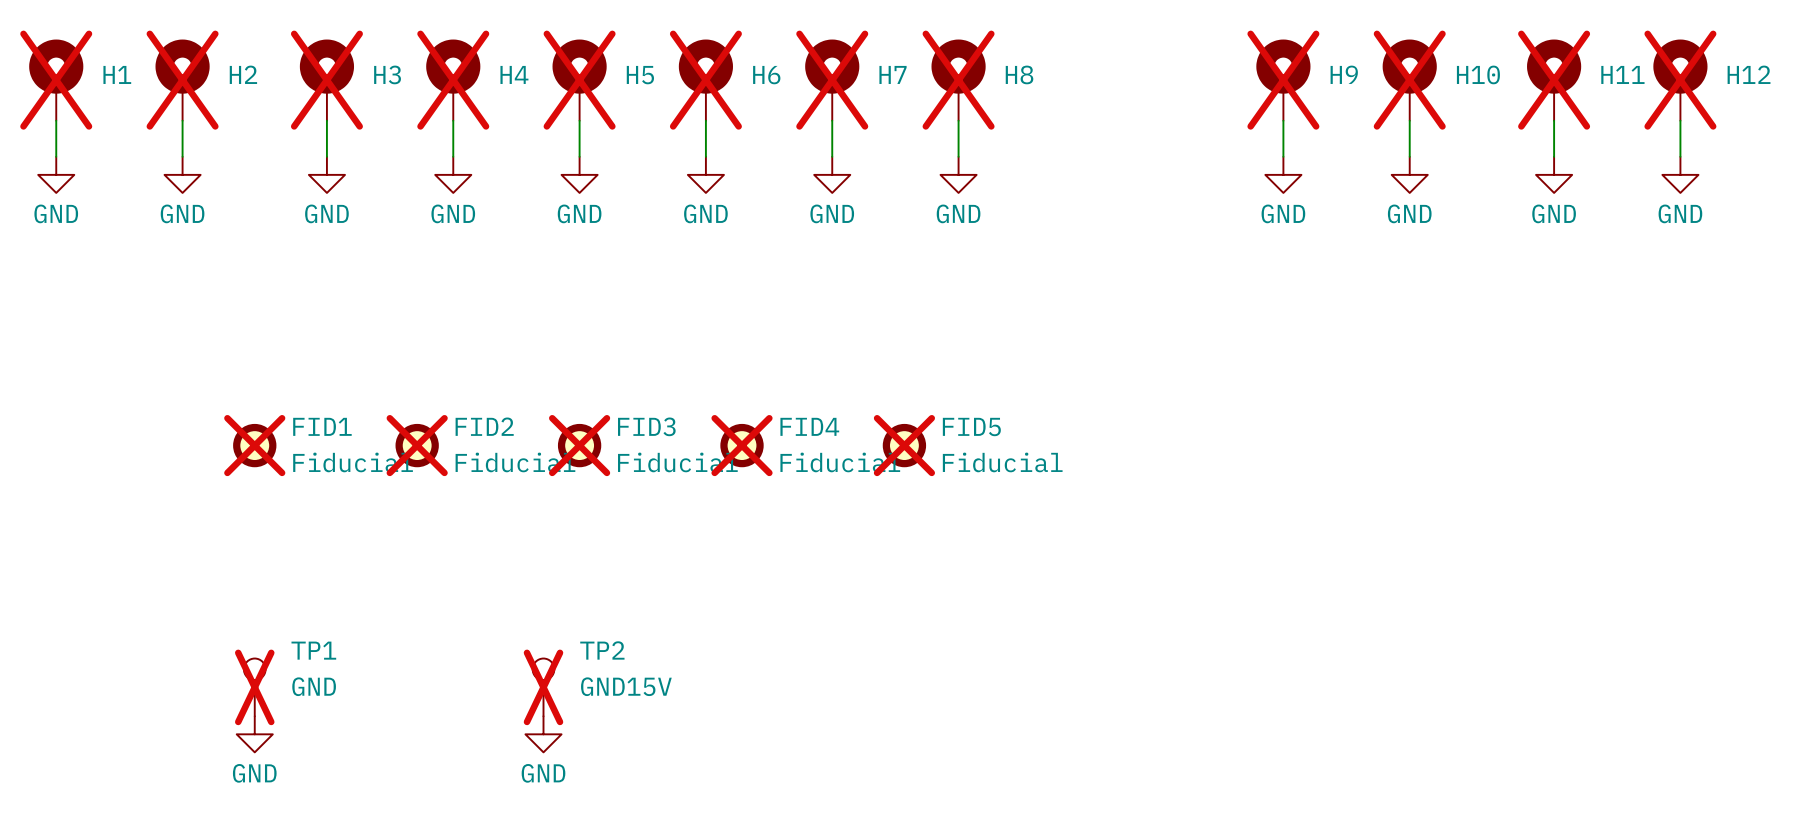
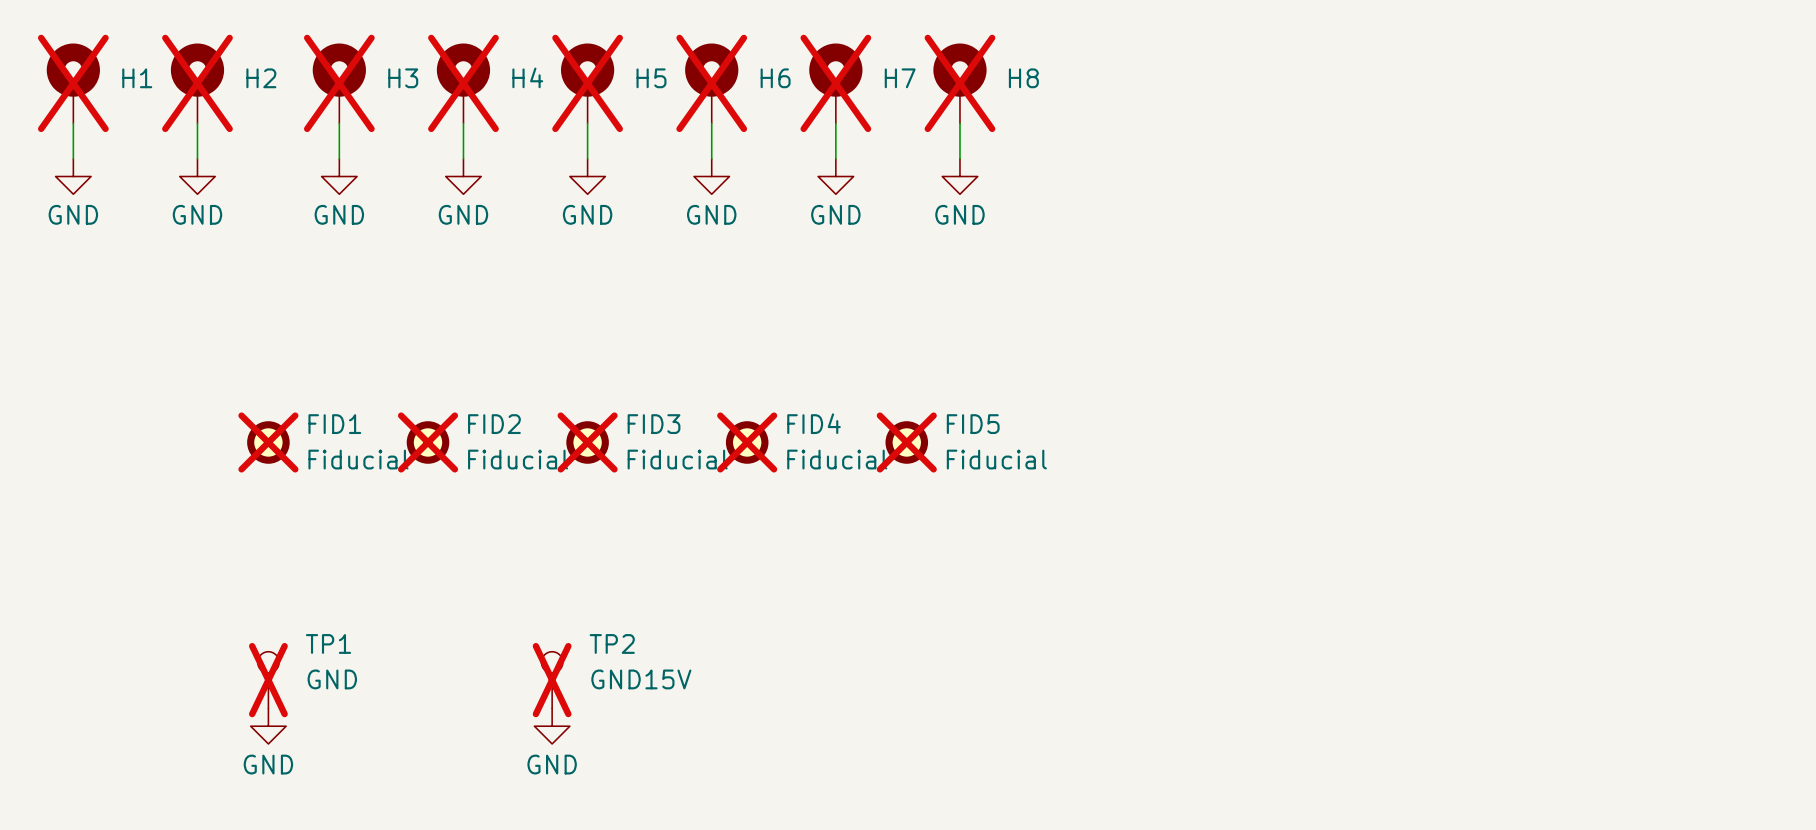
H9: (1283, 80) -> none
H10: (1409, 80) -> none
H11: (1554, 80) -> none
H12: (1680, 80) -> none
wire: (1283, 120) (1283, 156) -> none
wire: (1409, 120) (1409, 156) -> none
wire: (1554, 120) (1554, 156) -> none
wire: (1680, 120) (1680, 156) -> none
power symbol: GND (1283, 174) -> none
power symbol: GND (1409, 174) -> none
power symbol: GND (1554, 174) -> none
power symbol: GND (1680, 174) -> none

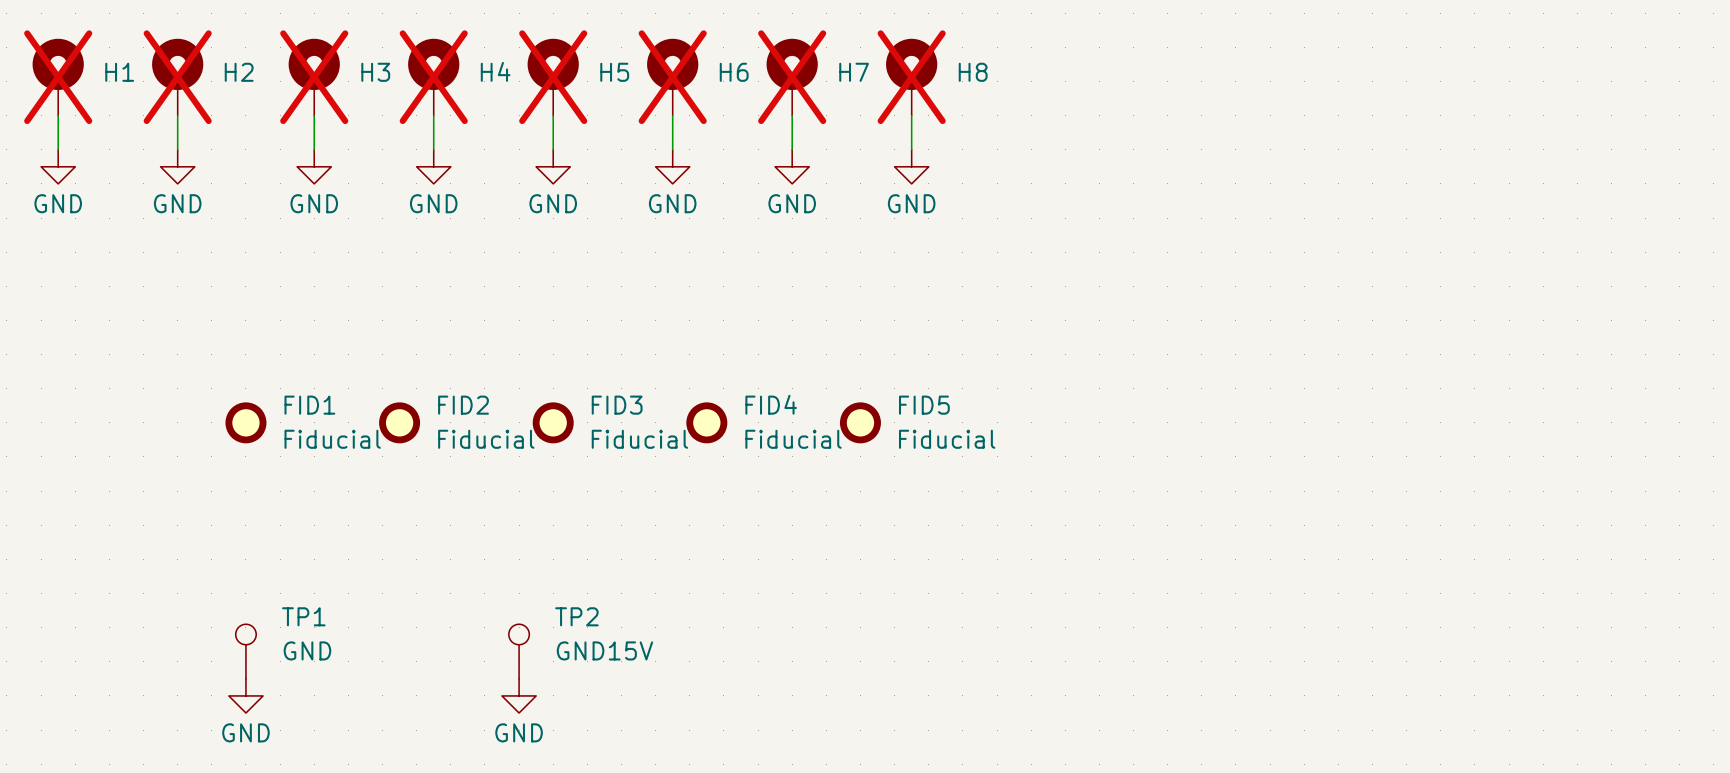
FID1 do-not-place cross: (268, 442) -> none
FID2 do-not-place cross: (428, 442) -> none
FID3 do-not-place cross: (587, 442) -> none
FID4 do-not-place cross: (747, 442) -> none
FID5 do-not-place cross: (906, 442) -> none
TP1 do-not-place cross: (268, 680) -> none
TP2 do-not-place cross: (552, 680) -> none

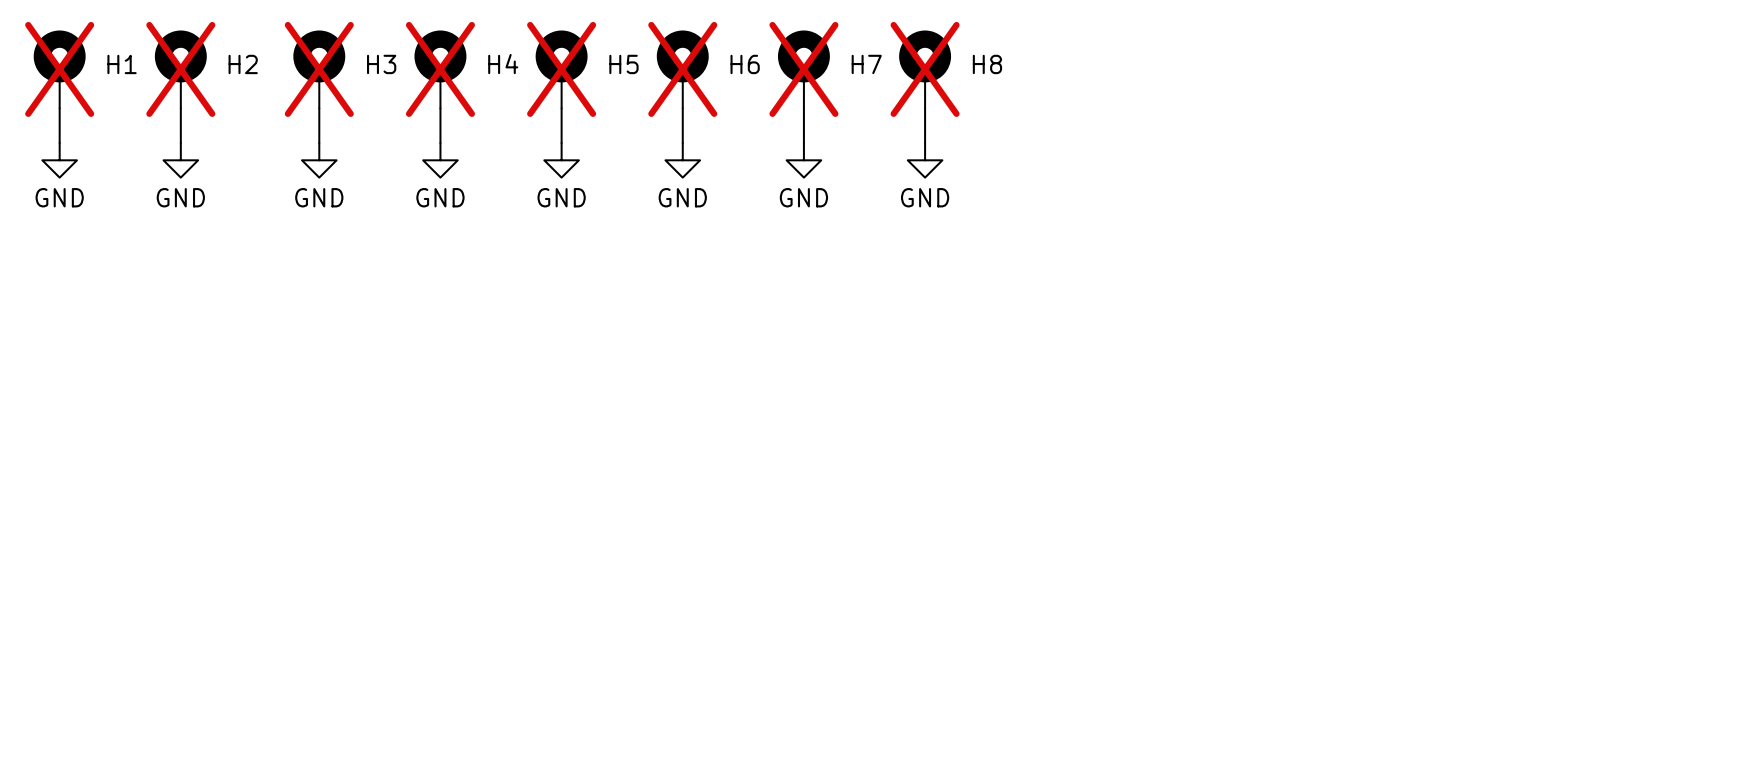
FID1: Fiducial (245, 422) -> none
FID2: Fiducial (399, 422) -> none
FID3: Fiducial (553, 422) -> none
FID4: Fiducial (706, 422) -> none
FID5: Fiducial (860, 422) -> none
TP1: GND (245, 651) -> none
TP2: GND15V (519, 651) -> none
power symbol: GND (245, 695) -> none
power symbol: GND (519, 695) -> none

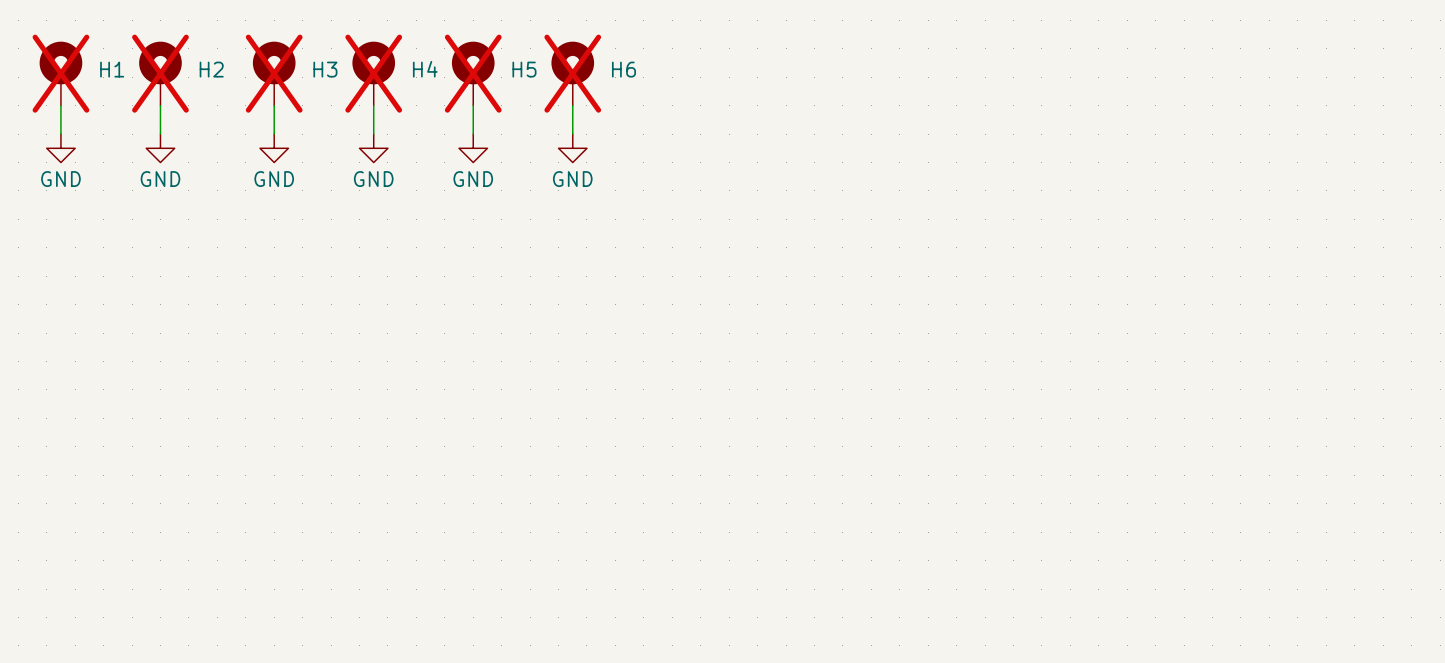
H7: (803, 69) -> none
H8: (925, 69) -> none
wire: (803, 108) (803, 142) -> none
wire: (925, 108) (925, 142) -> none
power symbol: GND (803, 160) -> none
power symbol: GND (925, 160) -> none

